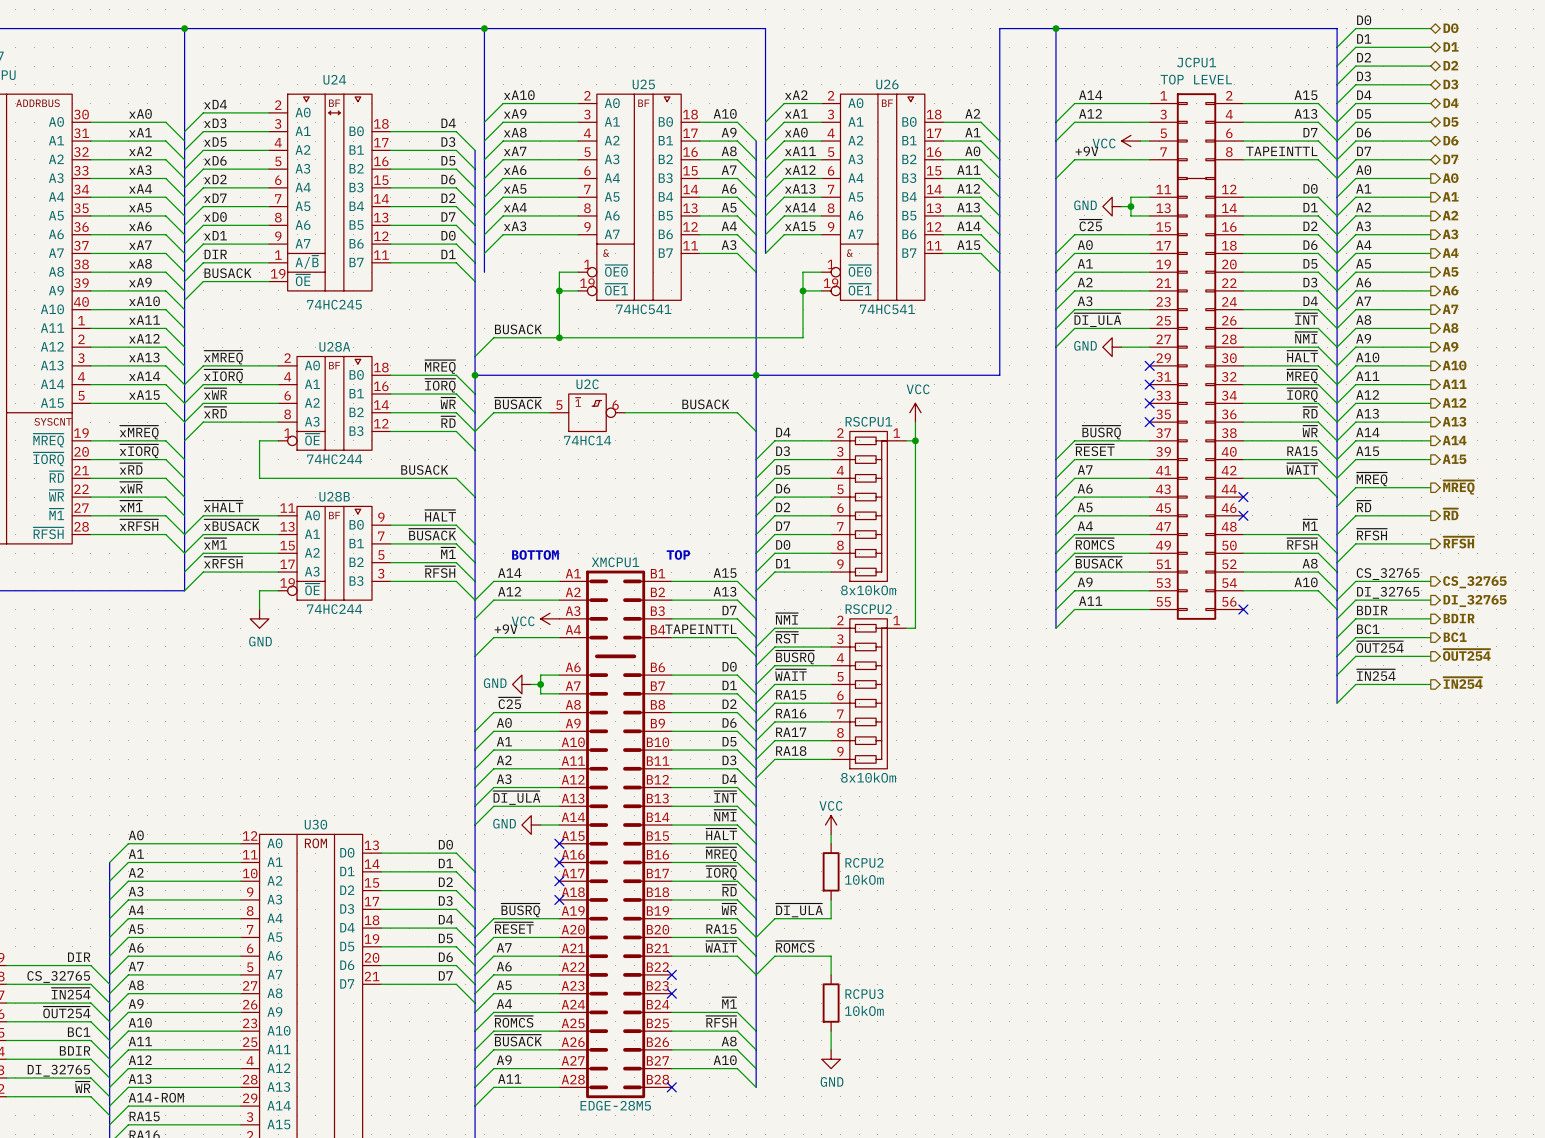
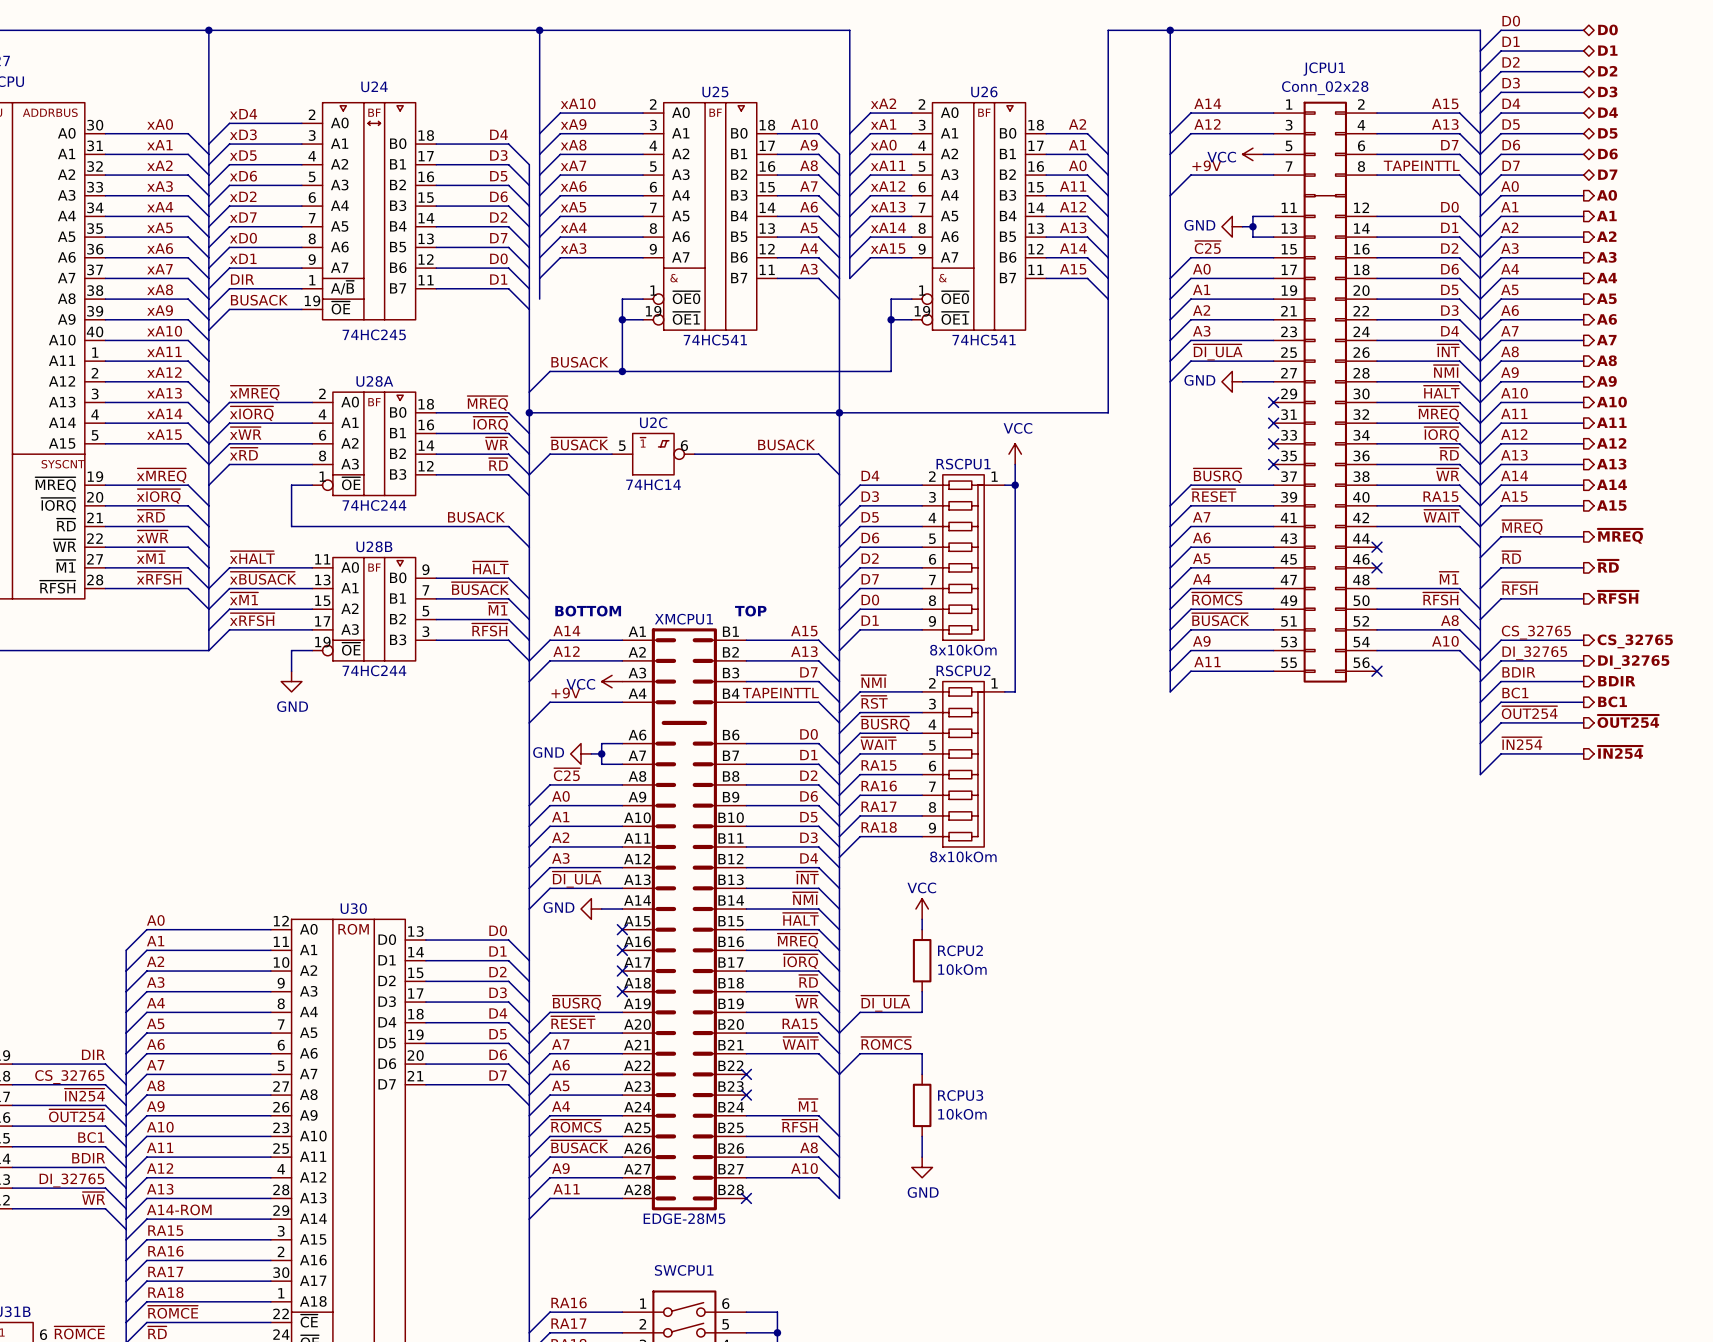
JCPU1 value: TOP LEVEL (1196, 79) -> Conn_02x28 (1325, 88)

